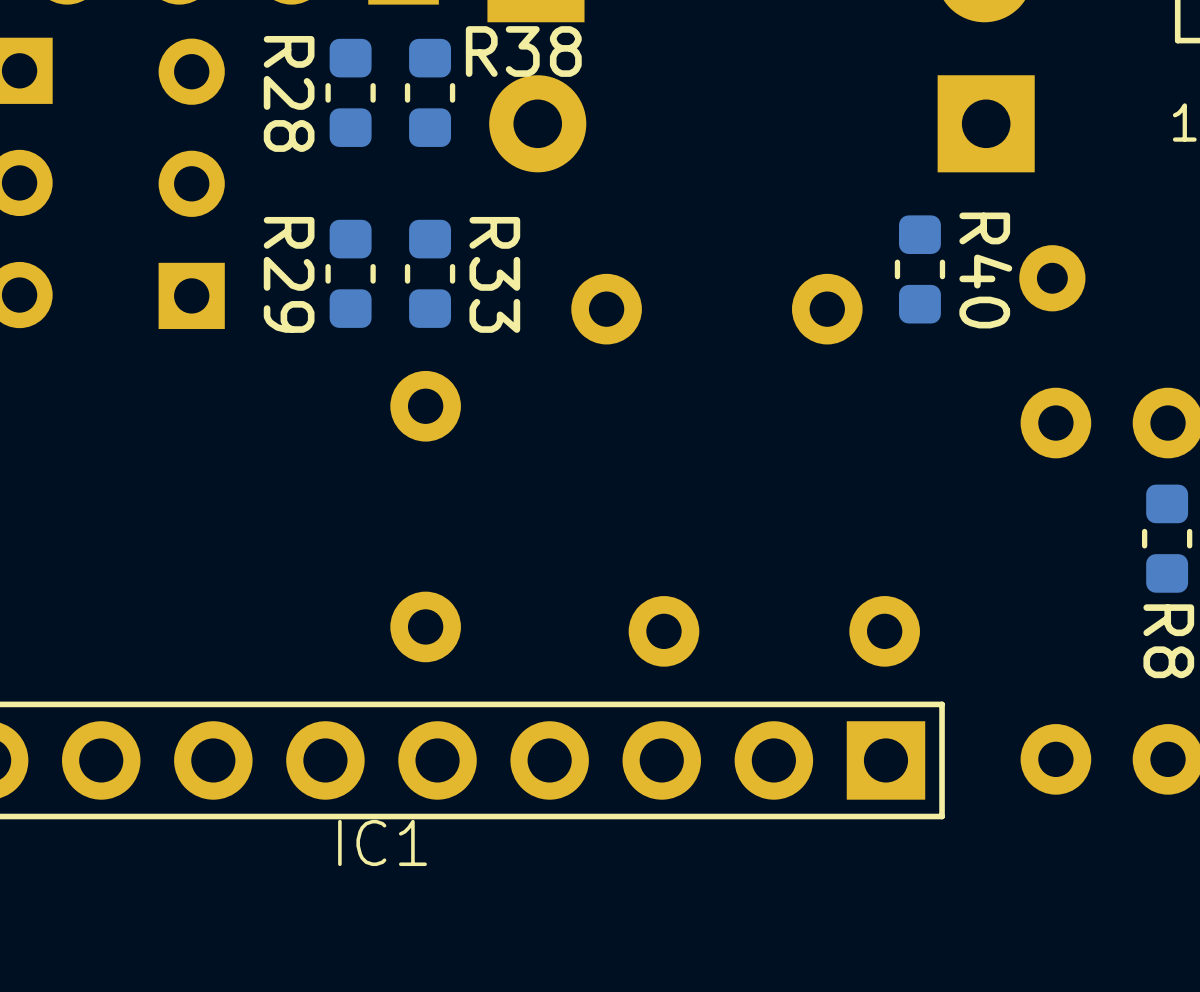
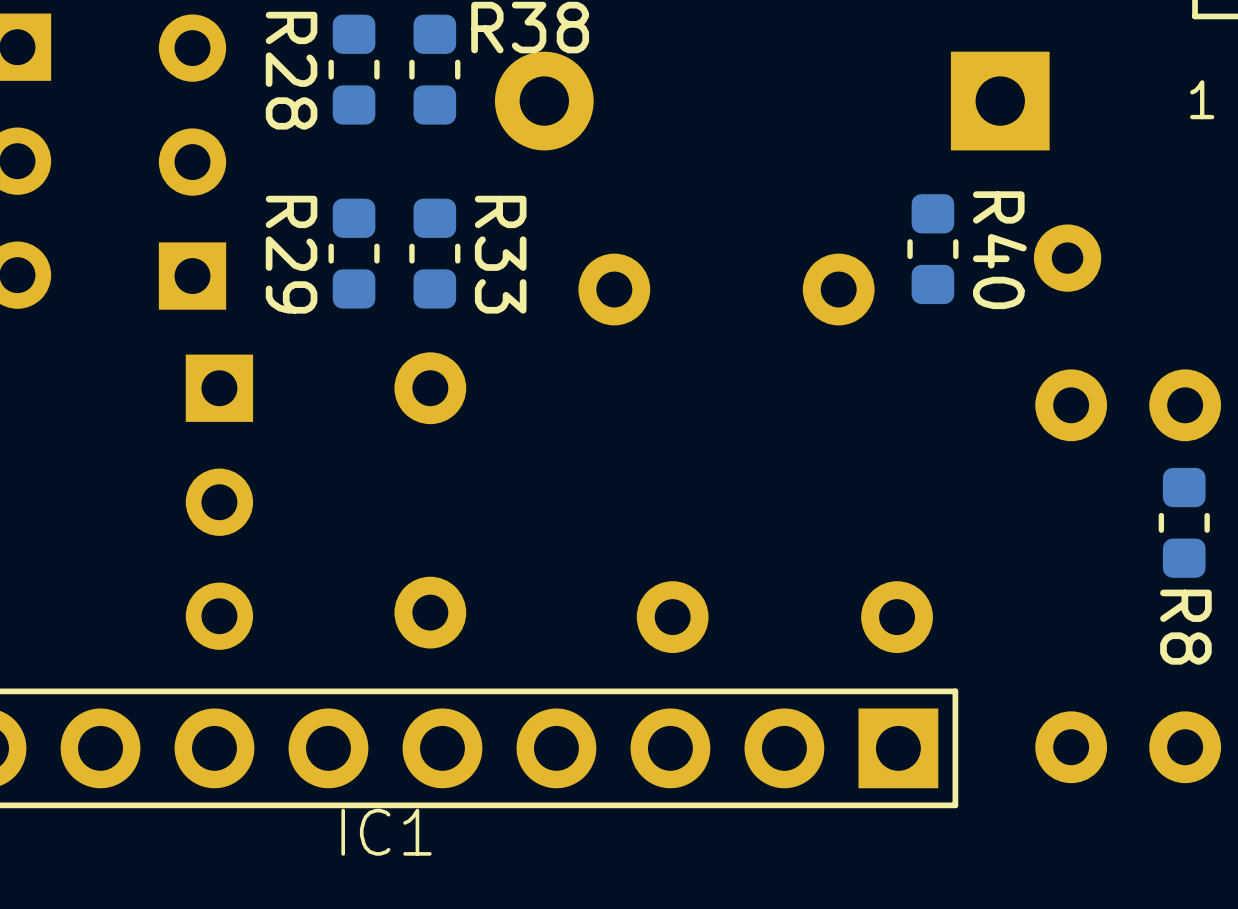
part: none -> (219, 502)

